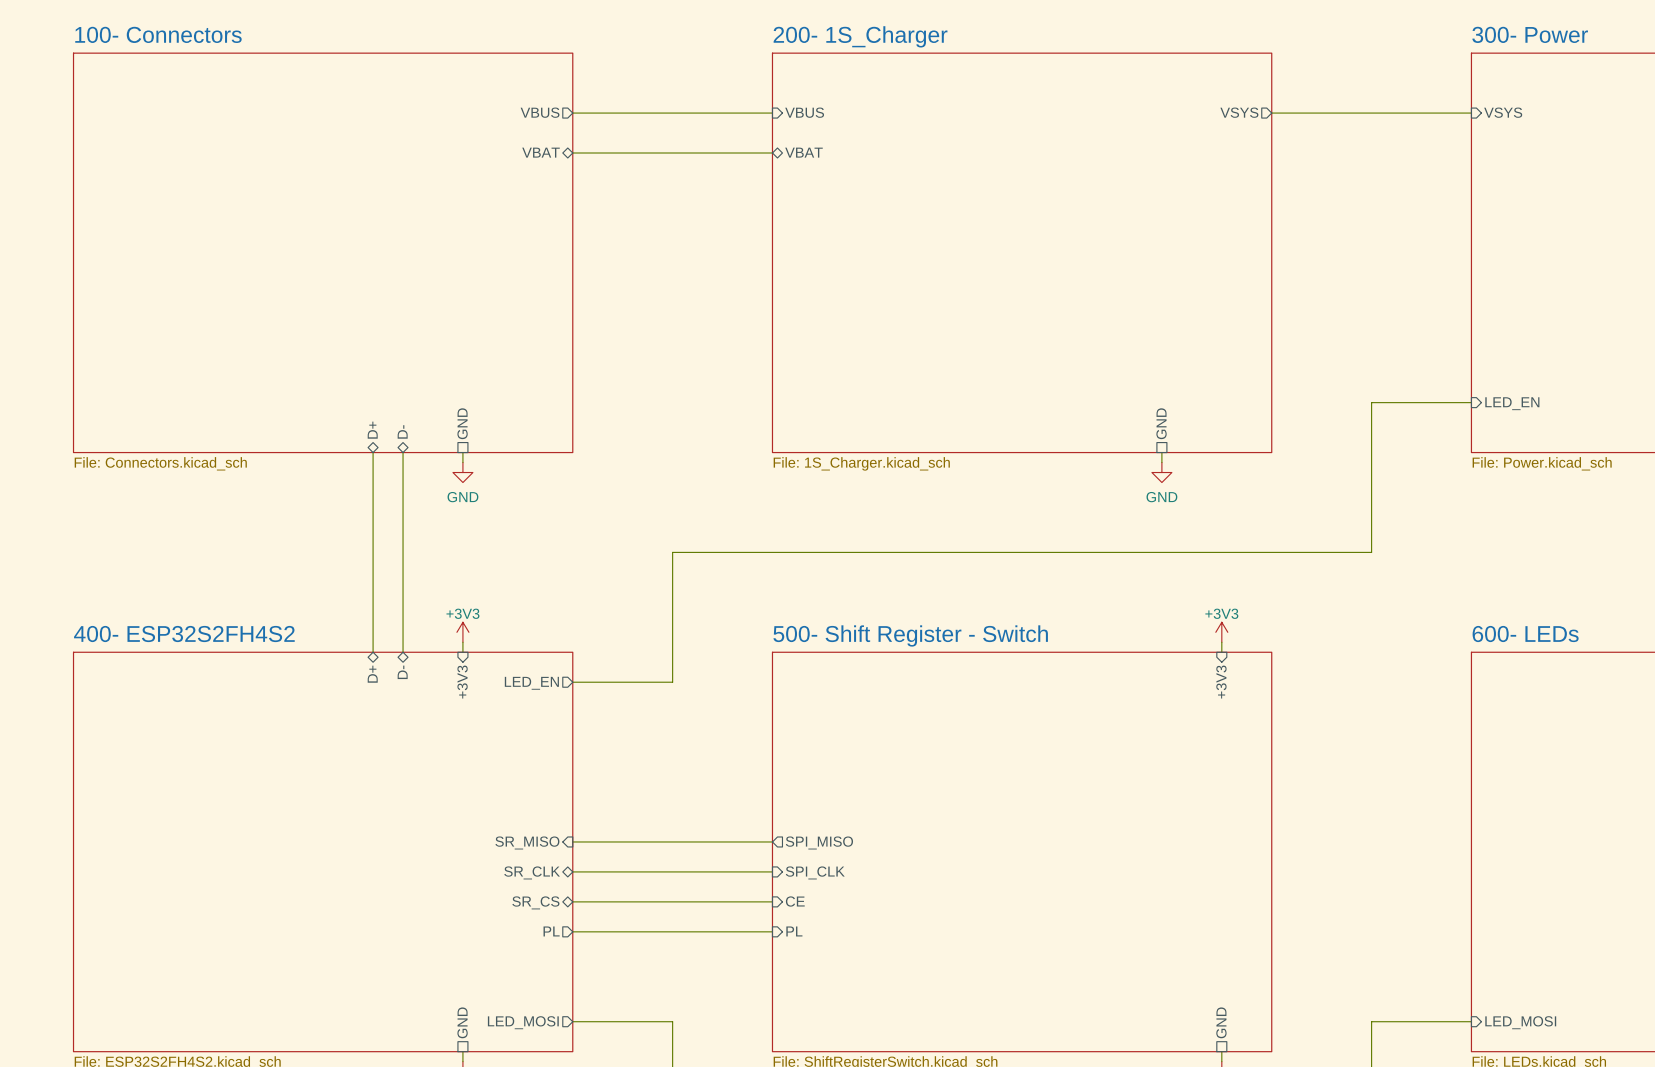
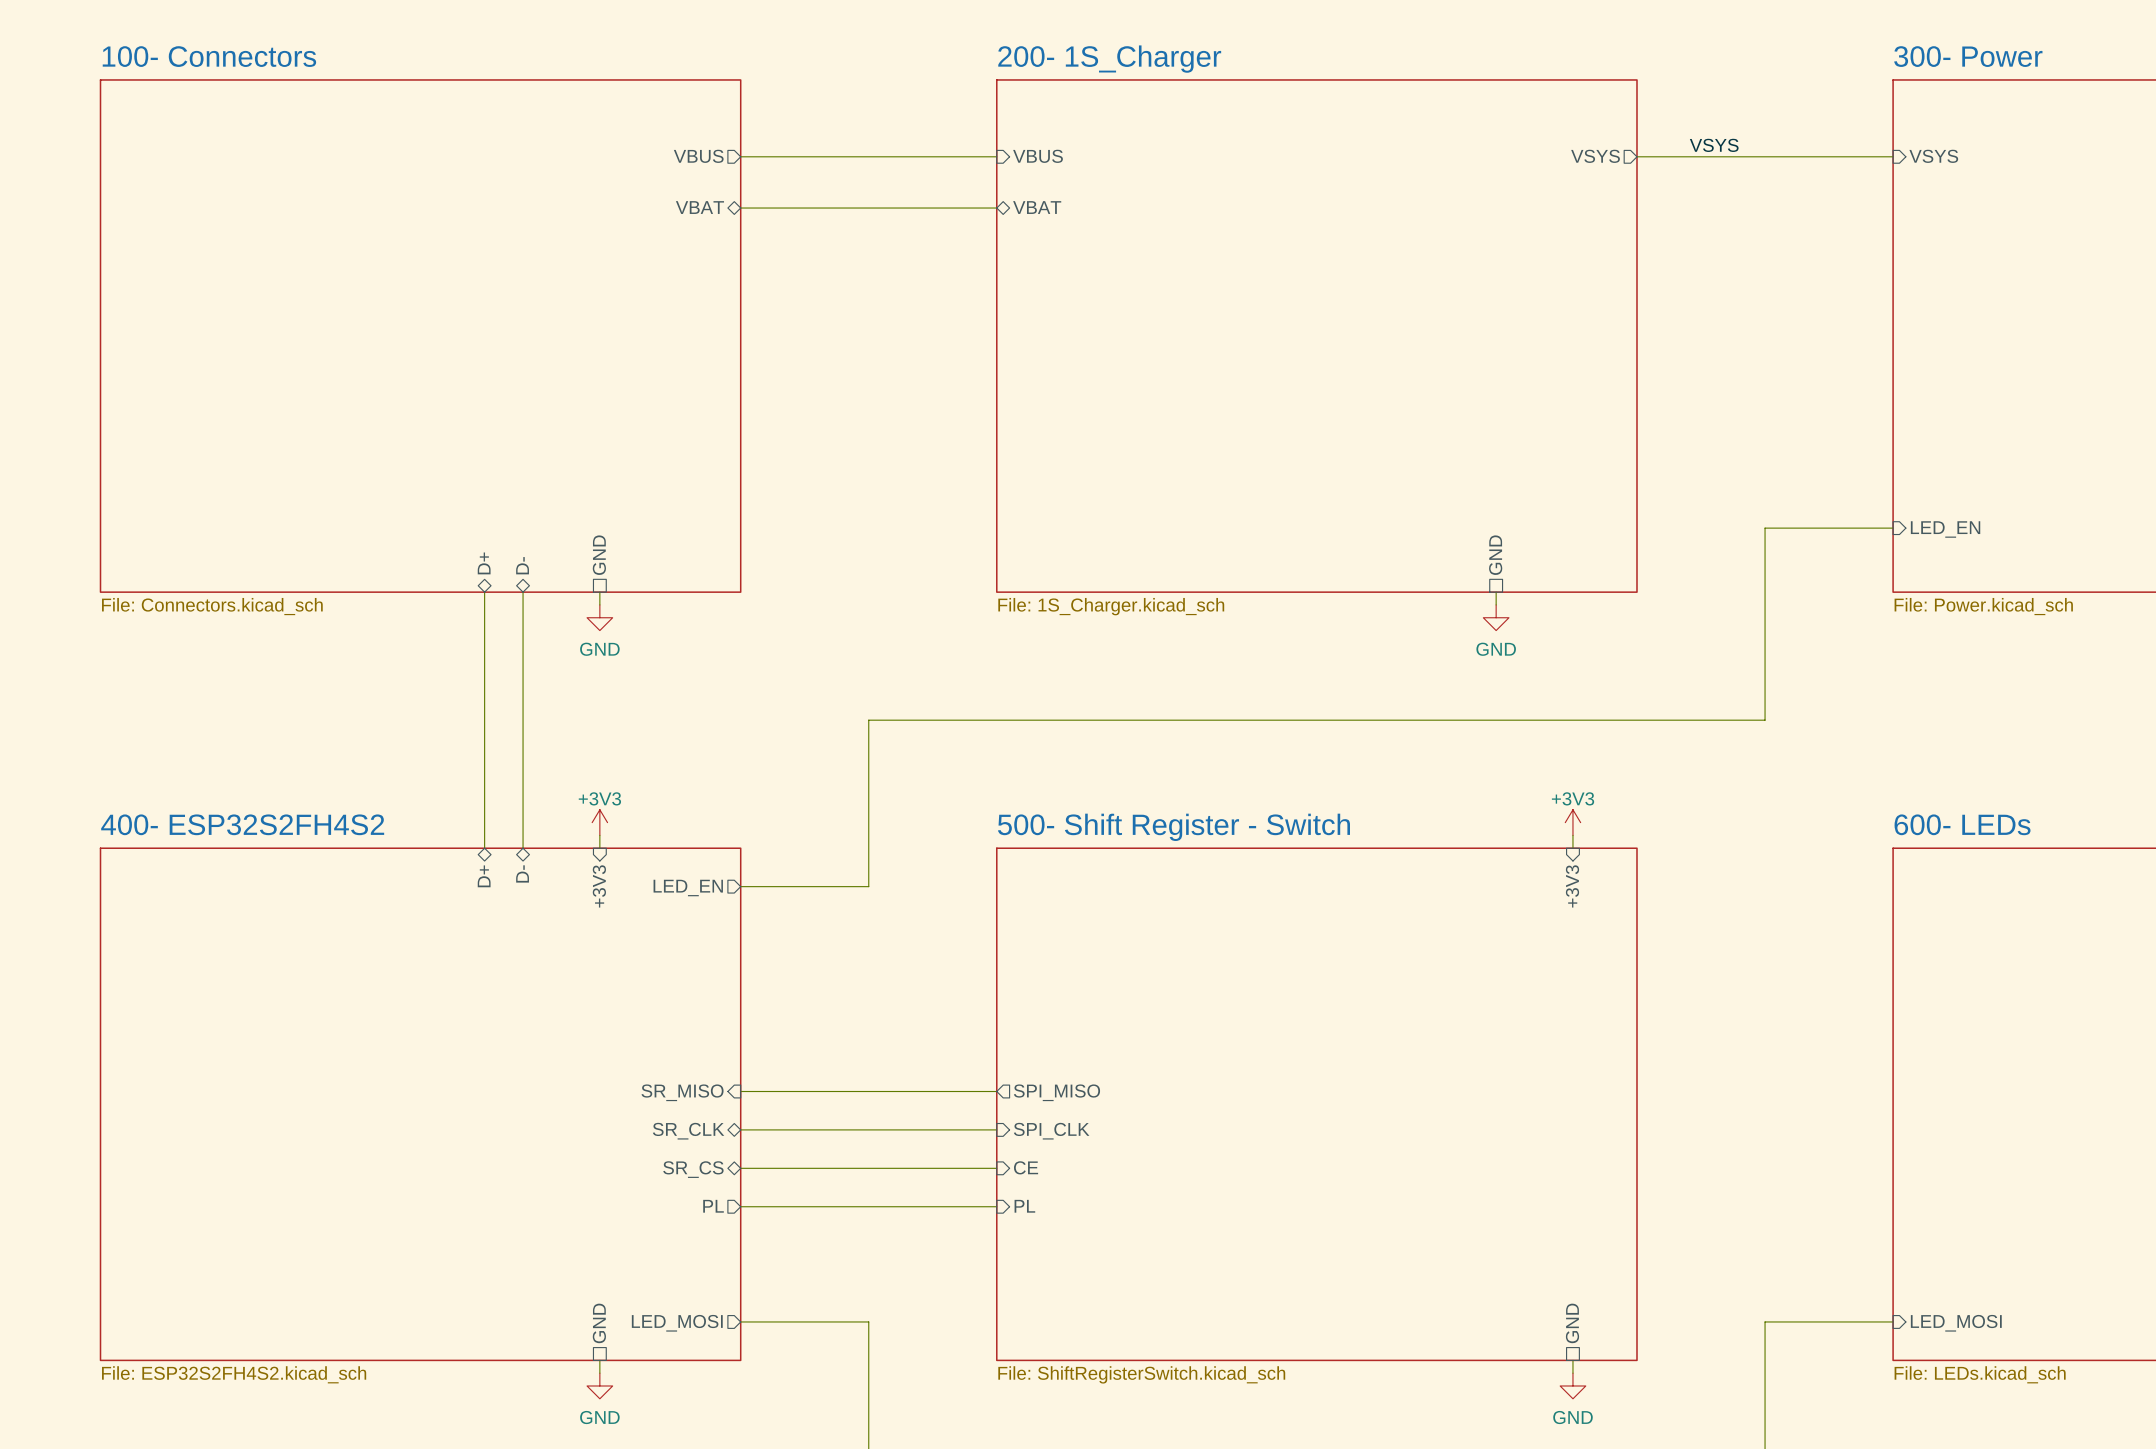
label: none -> VSYS (1714, 145)

